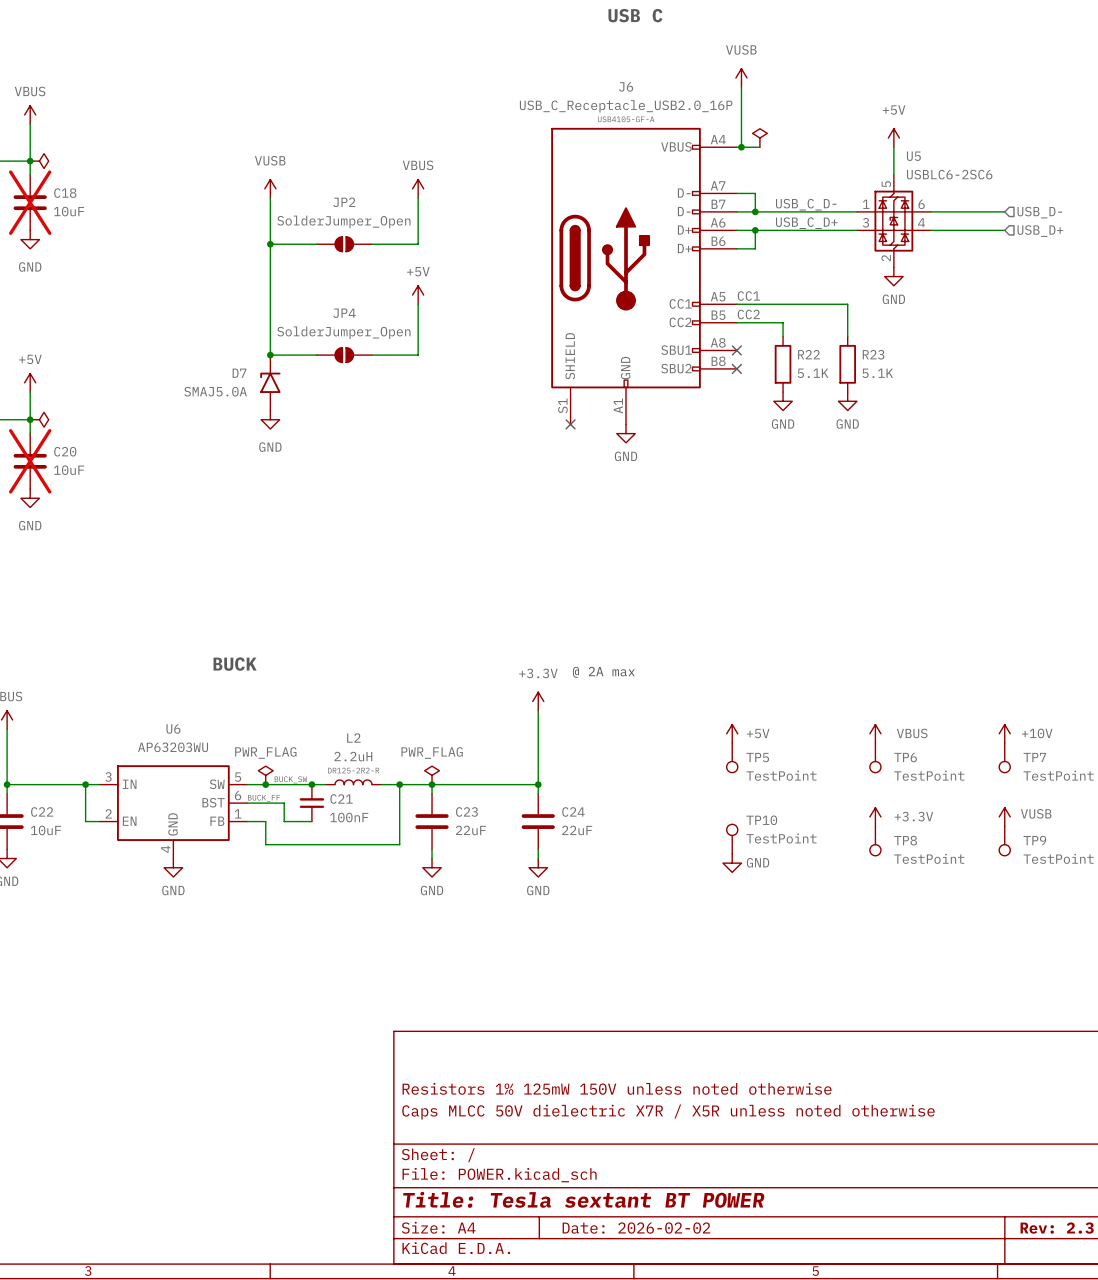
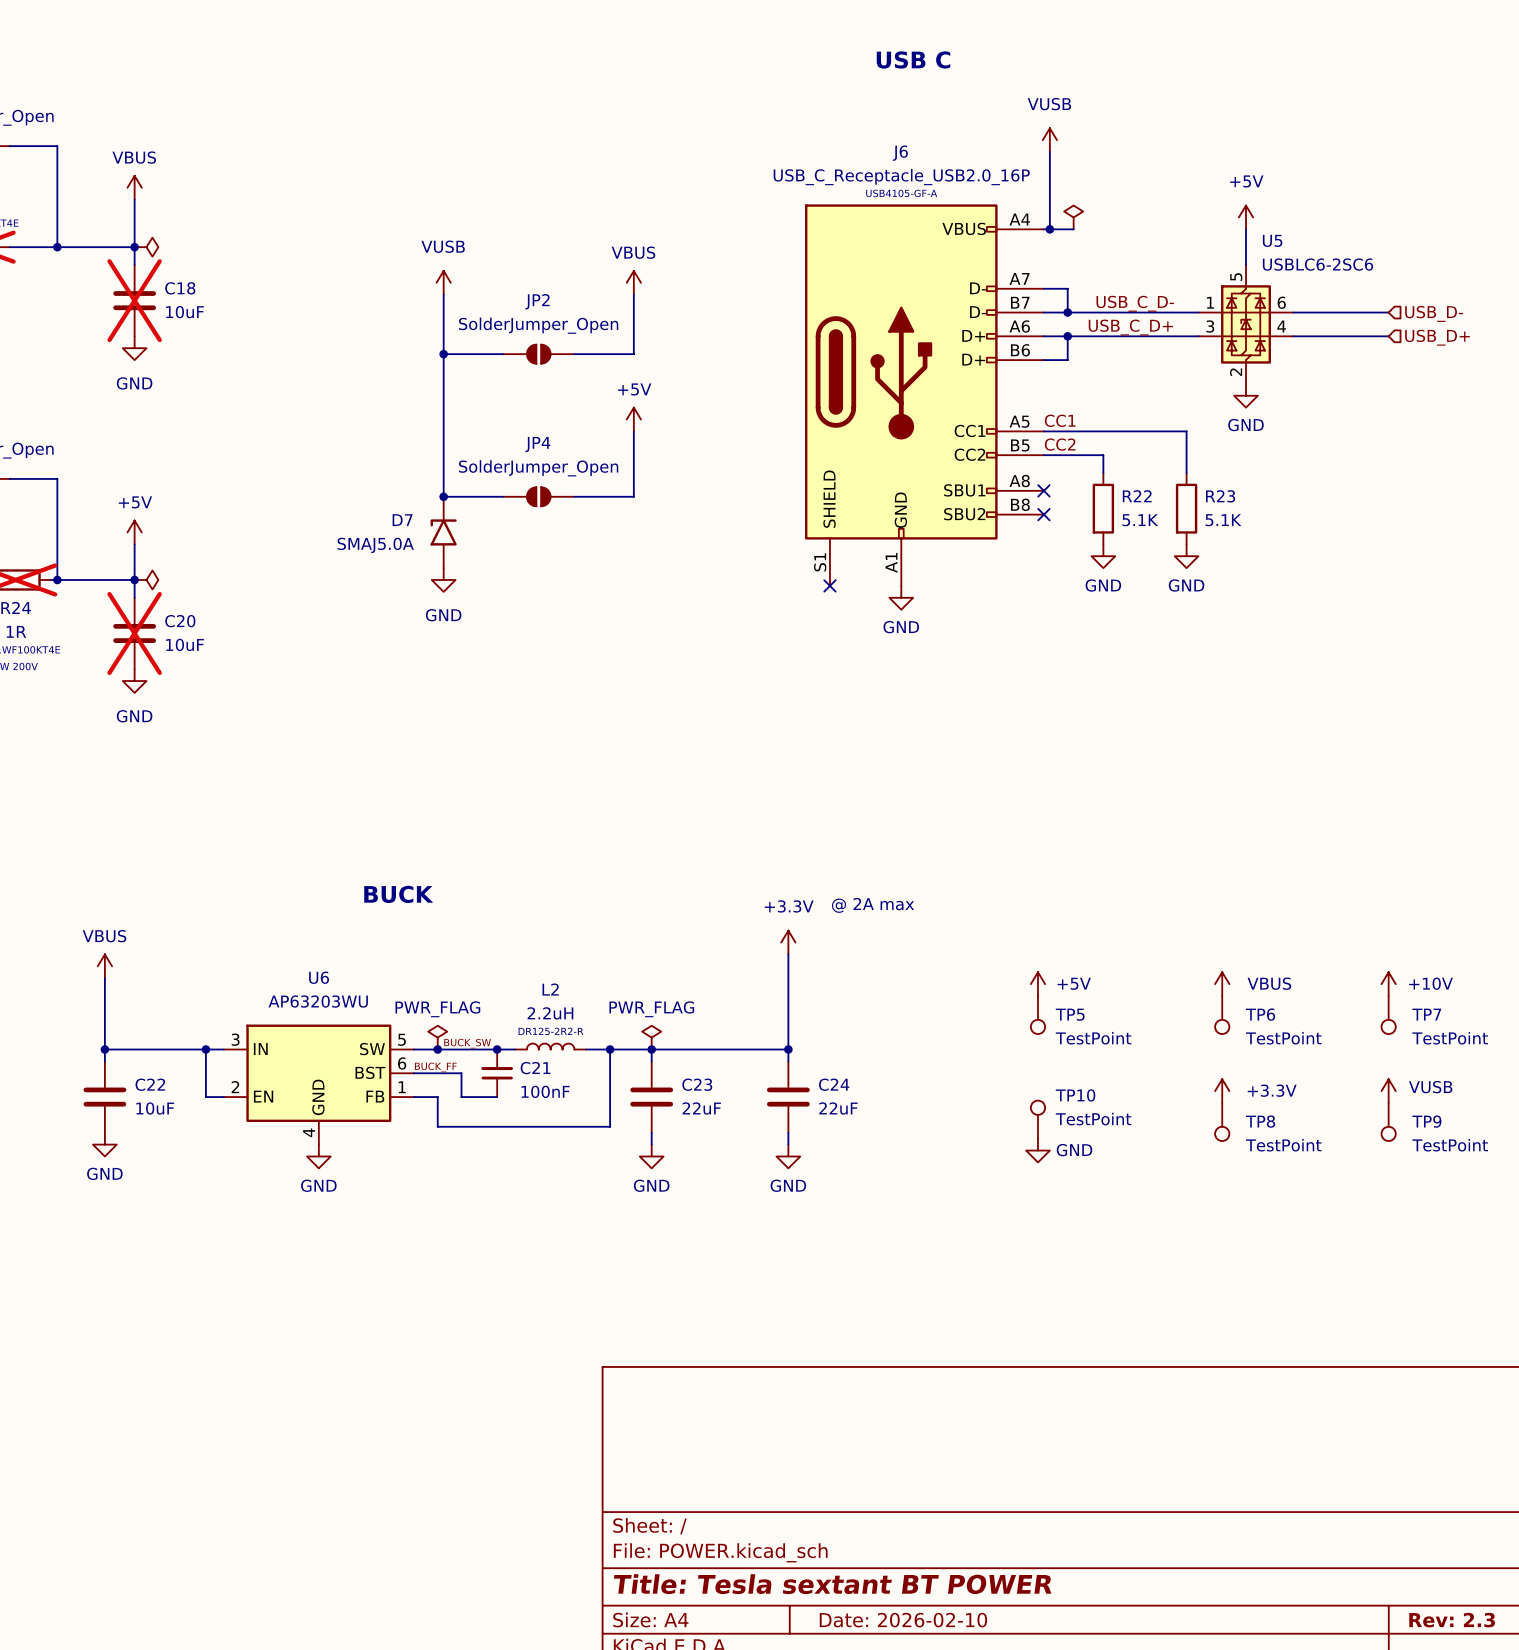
title block: Resistors 1% 125mW 150V unless noted otherwise (617, 1088) -> none
title block: Caps MLCC 50V dielectric X7R / X5R unless noted otherwise (668, 1112) -> none
title block: Date: 2026-02-02 (636, 1228) -> Date: 2026-02-10 (903, 1620)

